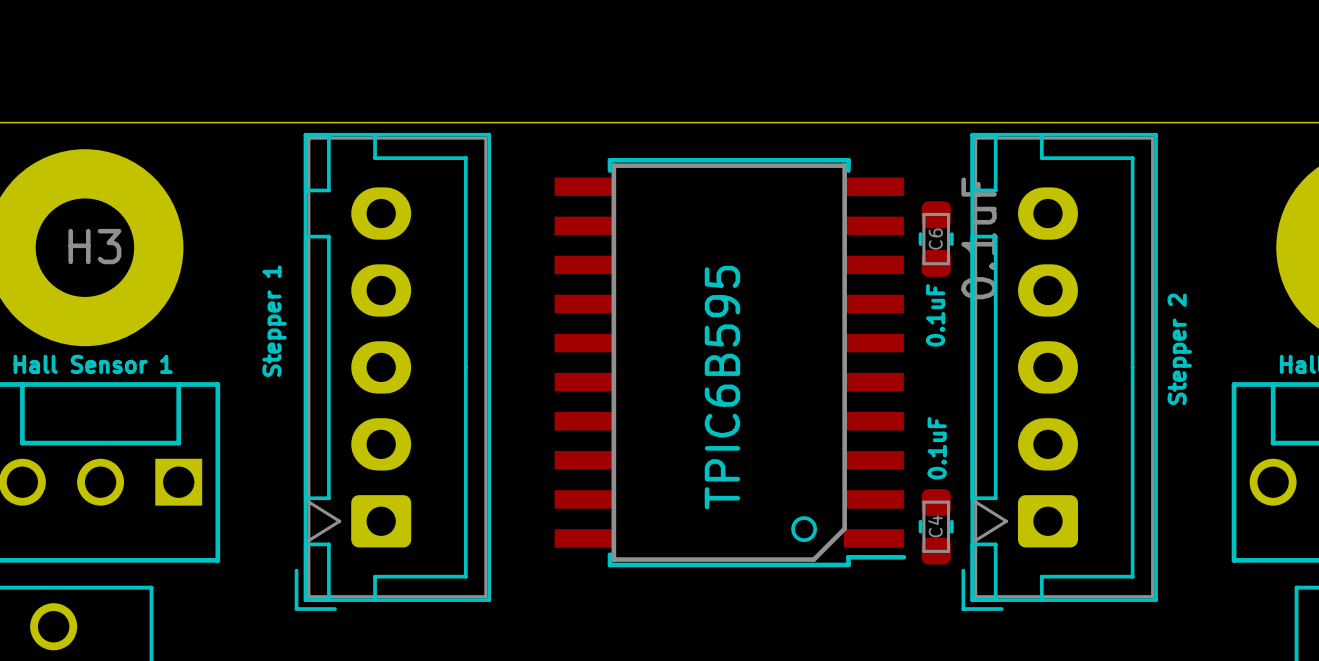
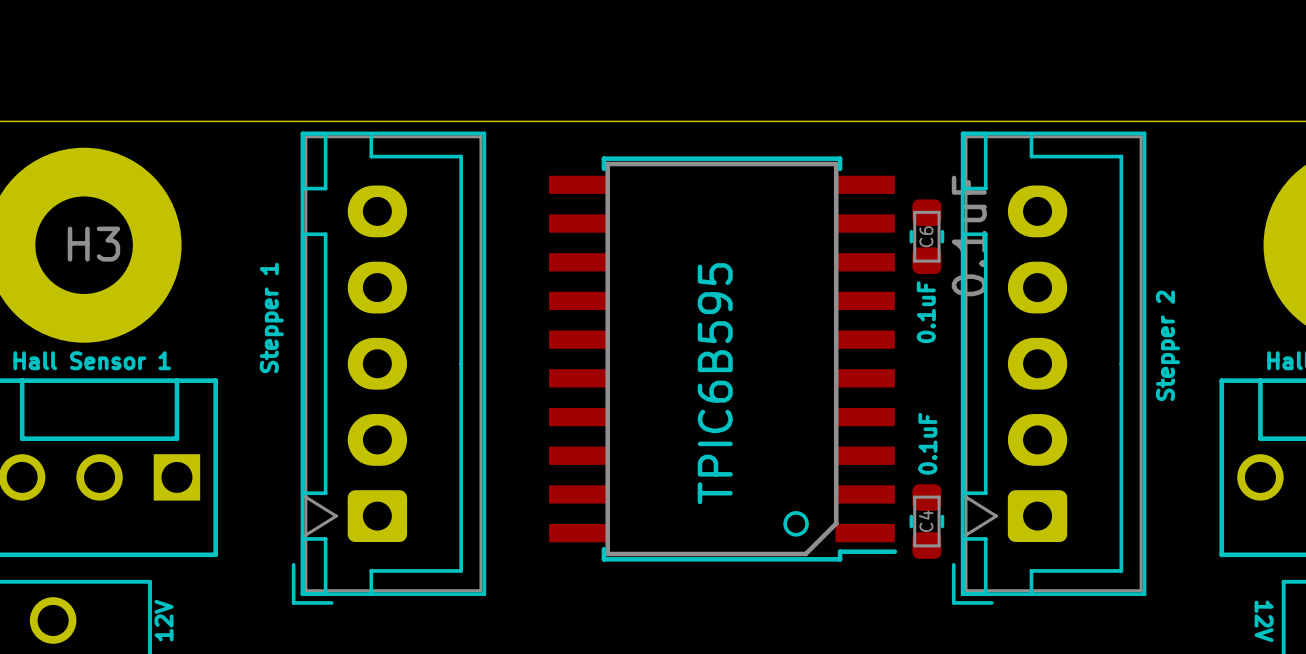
text: none -> 12V (164, 620)
text: none -> 12V (1264, 621)

